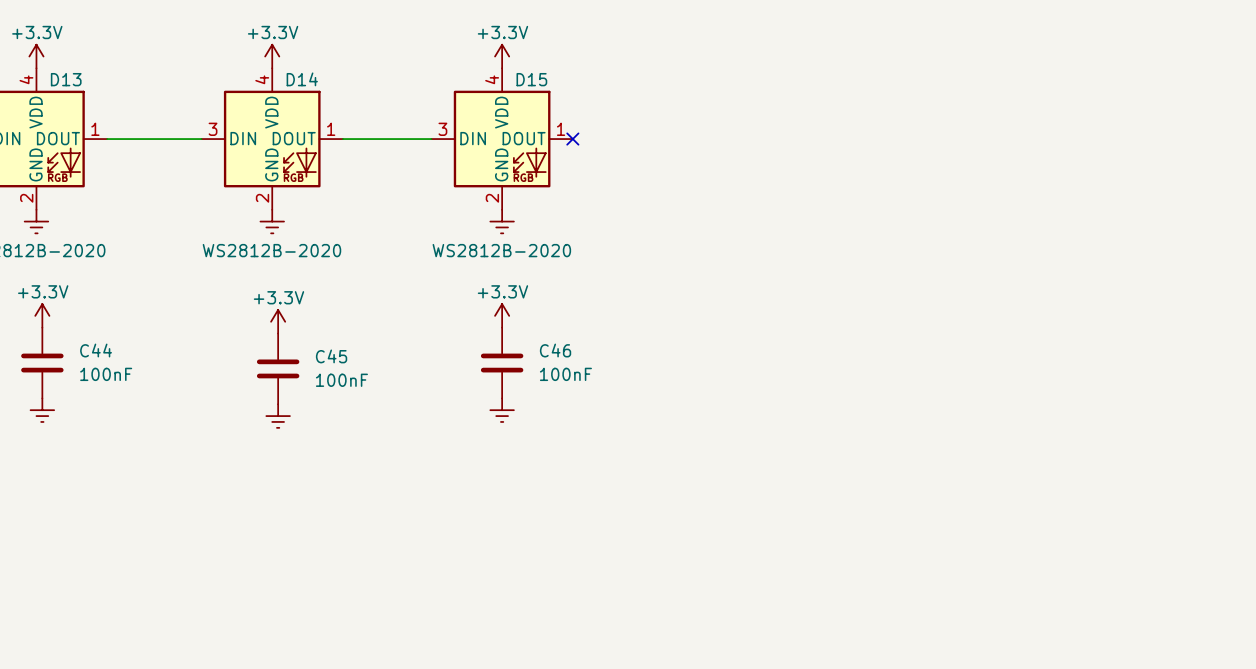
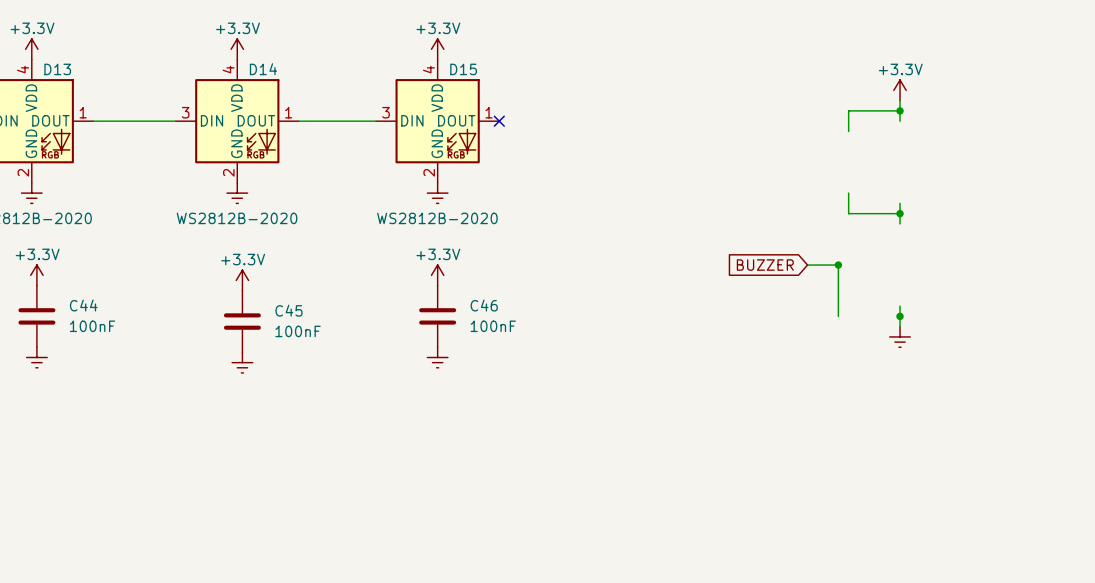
power symbol: none -> +3.3V (900, 90)
wire: none -> (900, 100) (900, 121)
wire: none -> (900, 110) (848, 110) (848, 131)
junction: none -> (900, 110)
wire: none -> (848, 193) (848, 213) (900, 213)
wire: none -> (900, 203) (900, 223)
junction: none -> (900, 213)
global label: none -> BUZZER (765, 265)
wire: none -> (807, 265) (838, 265) (838, 316)
junction: none -> (838, 265)
wire: none -> (900, 306) (900, 326)
junction: none -> (900, 316)
power symbol: none -> (900, 336)

